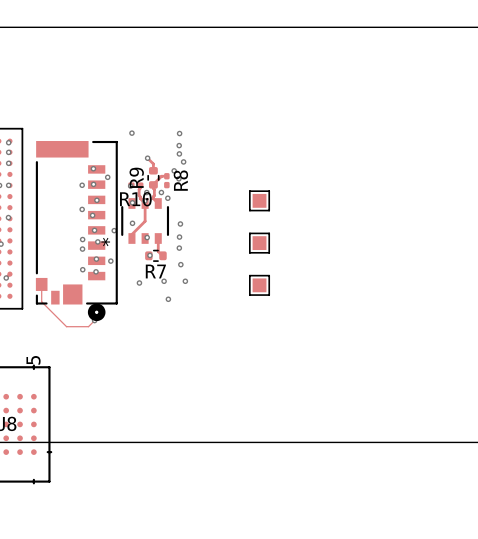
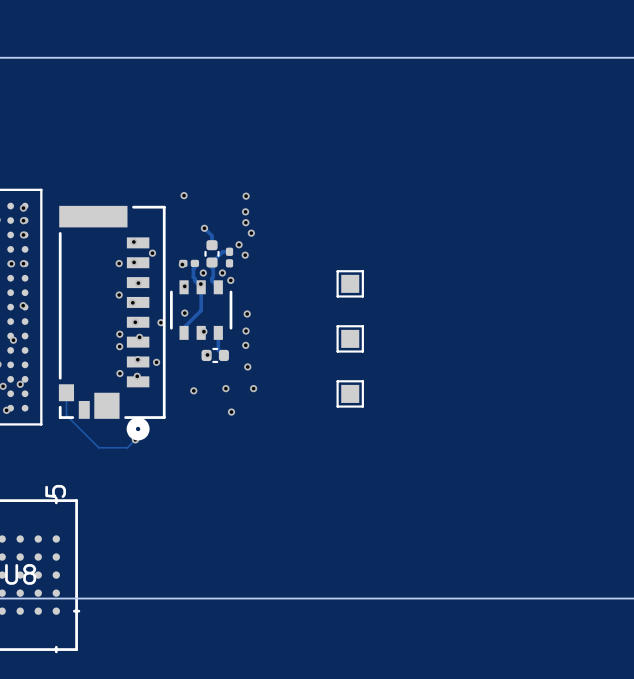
R9: (153, 177) -> none
part: none -> (212, 253)
R8 name: R8 (180, 180) -> none
R10 name: R10 (135, 199) -> none
part text: * (105, 242) -> none
R7: (155, 255) -> none
part: none -> (215, 355)

